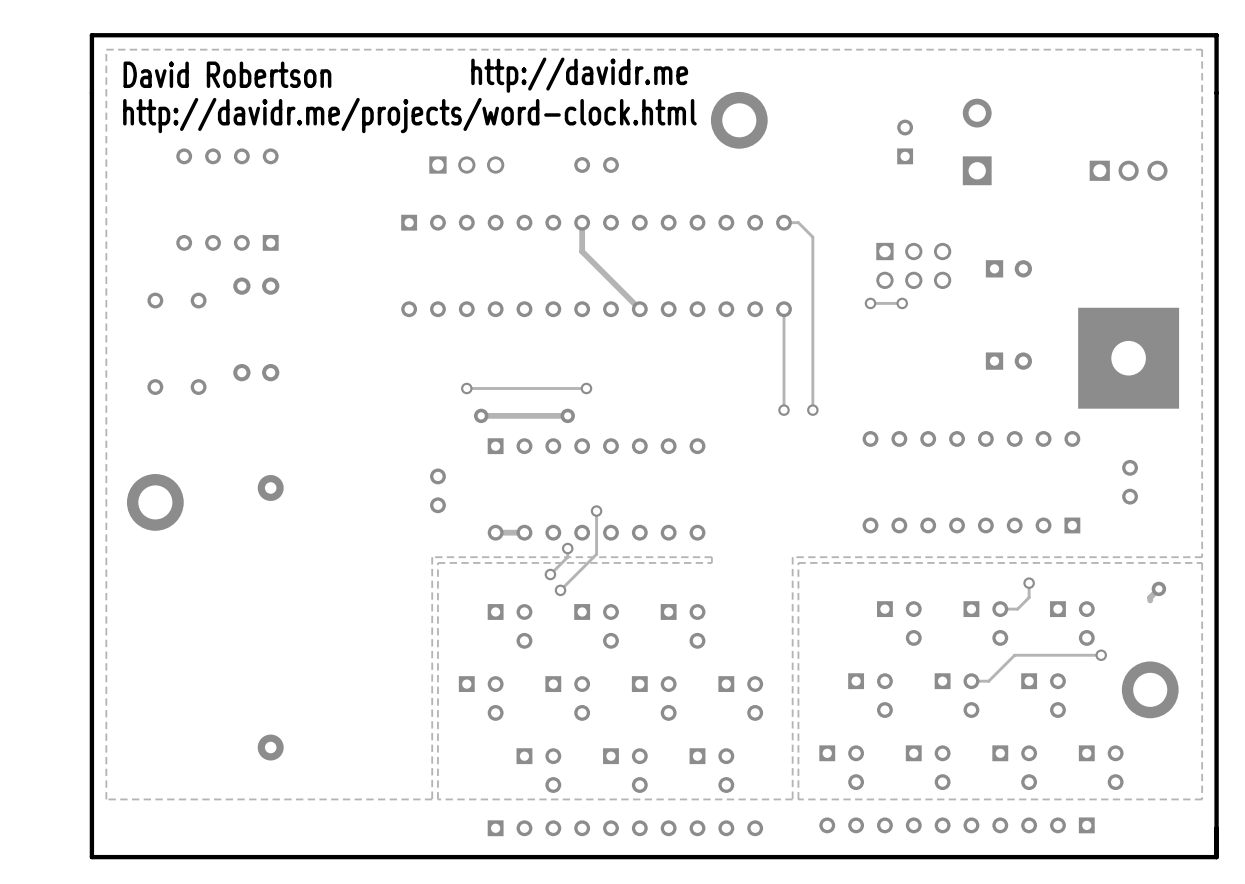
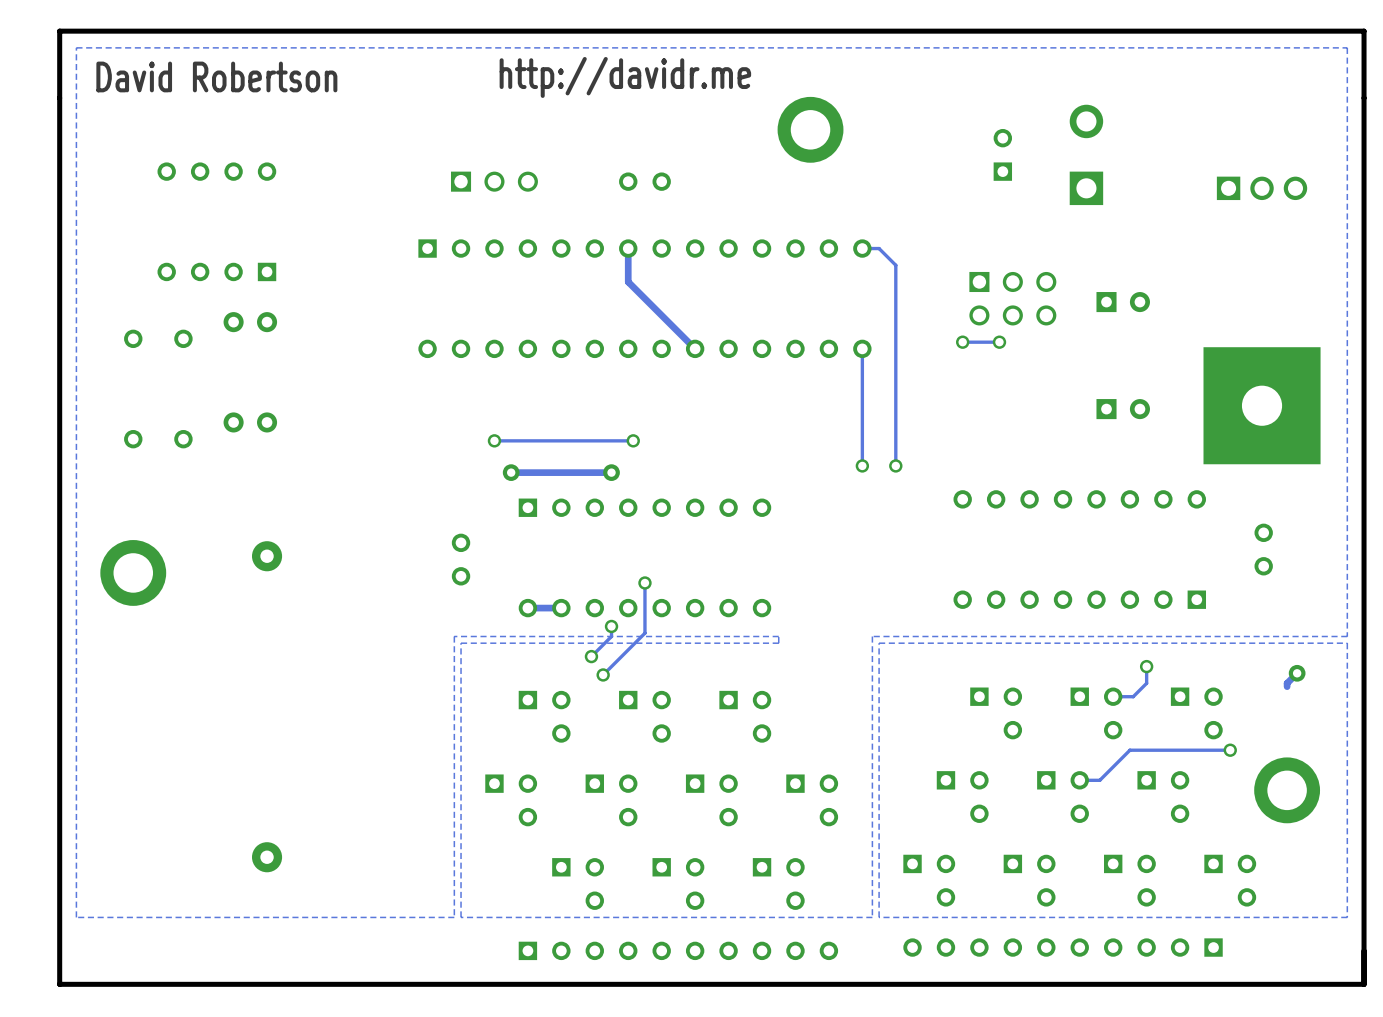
text: http://davidr.me/projects/word-clock.html (409, 115) -> none

